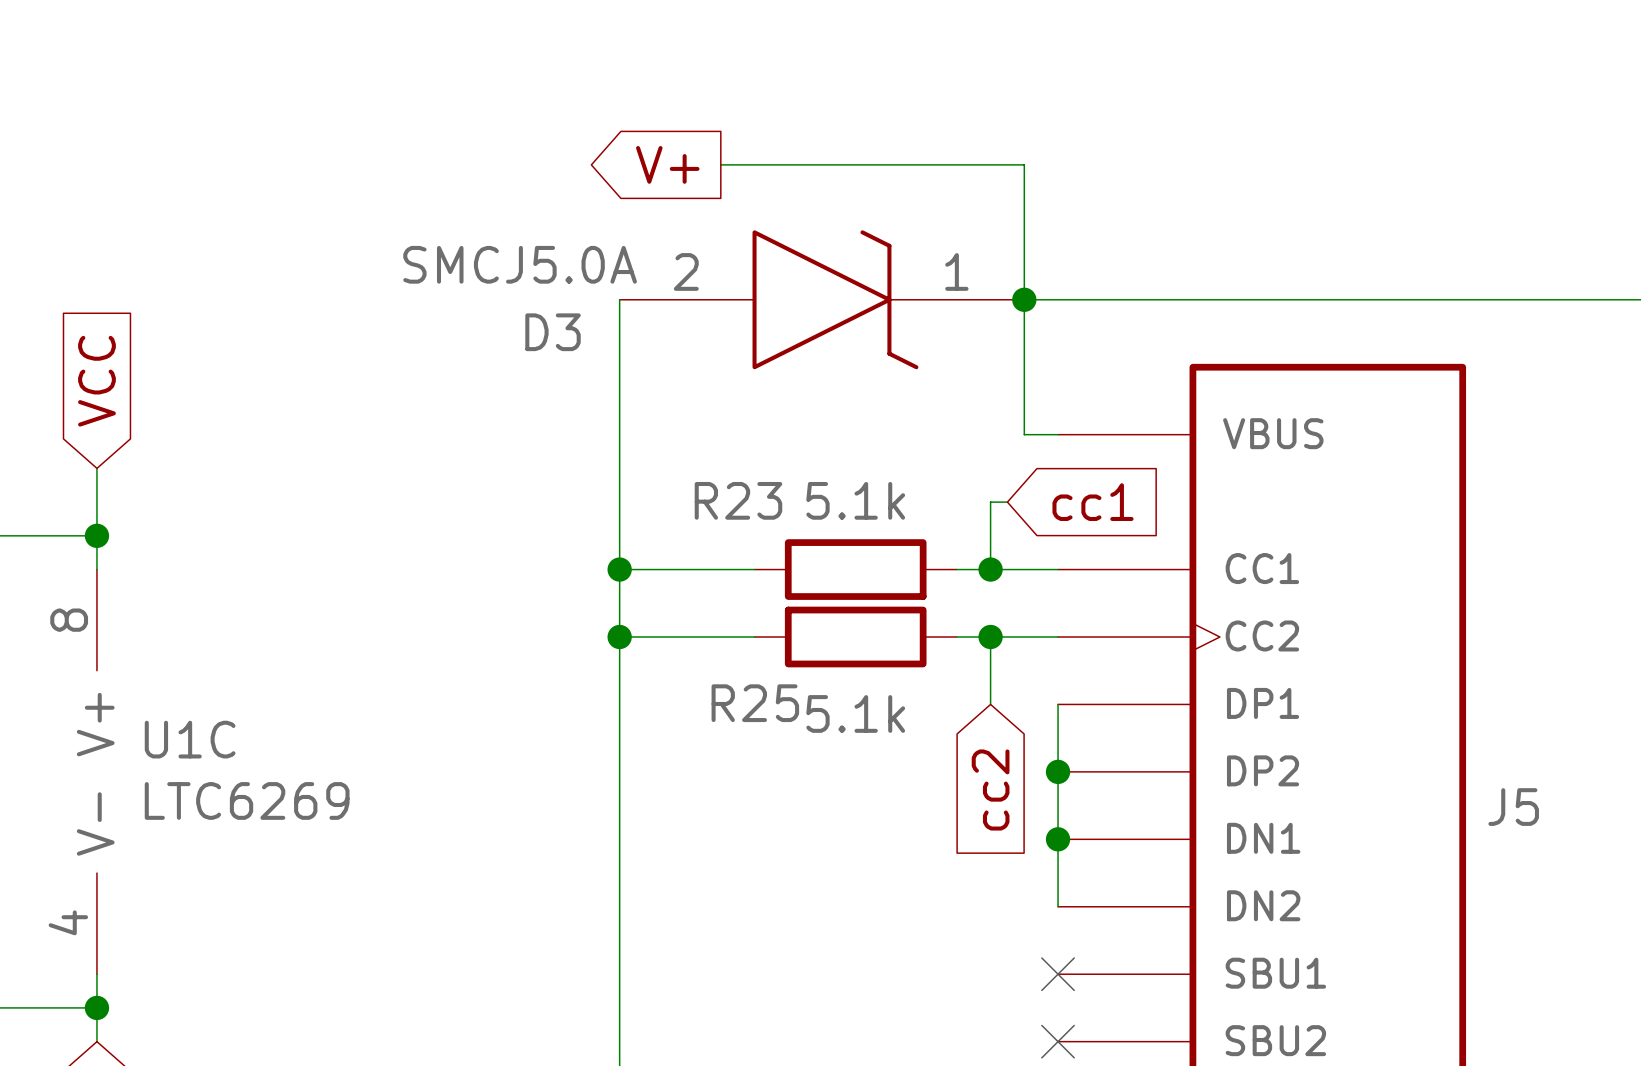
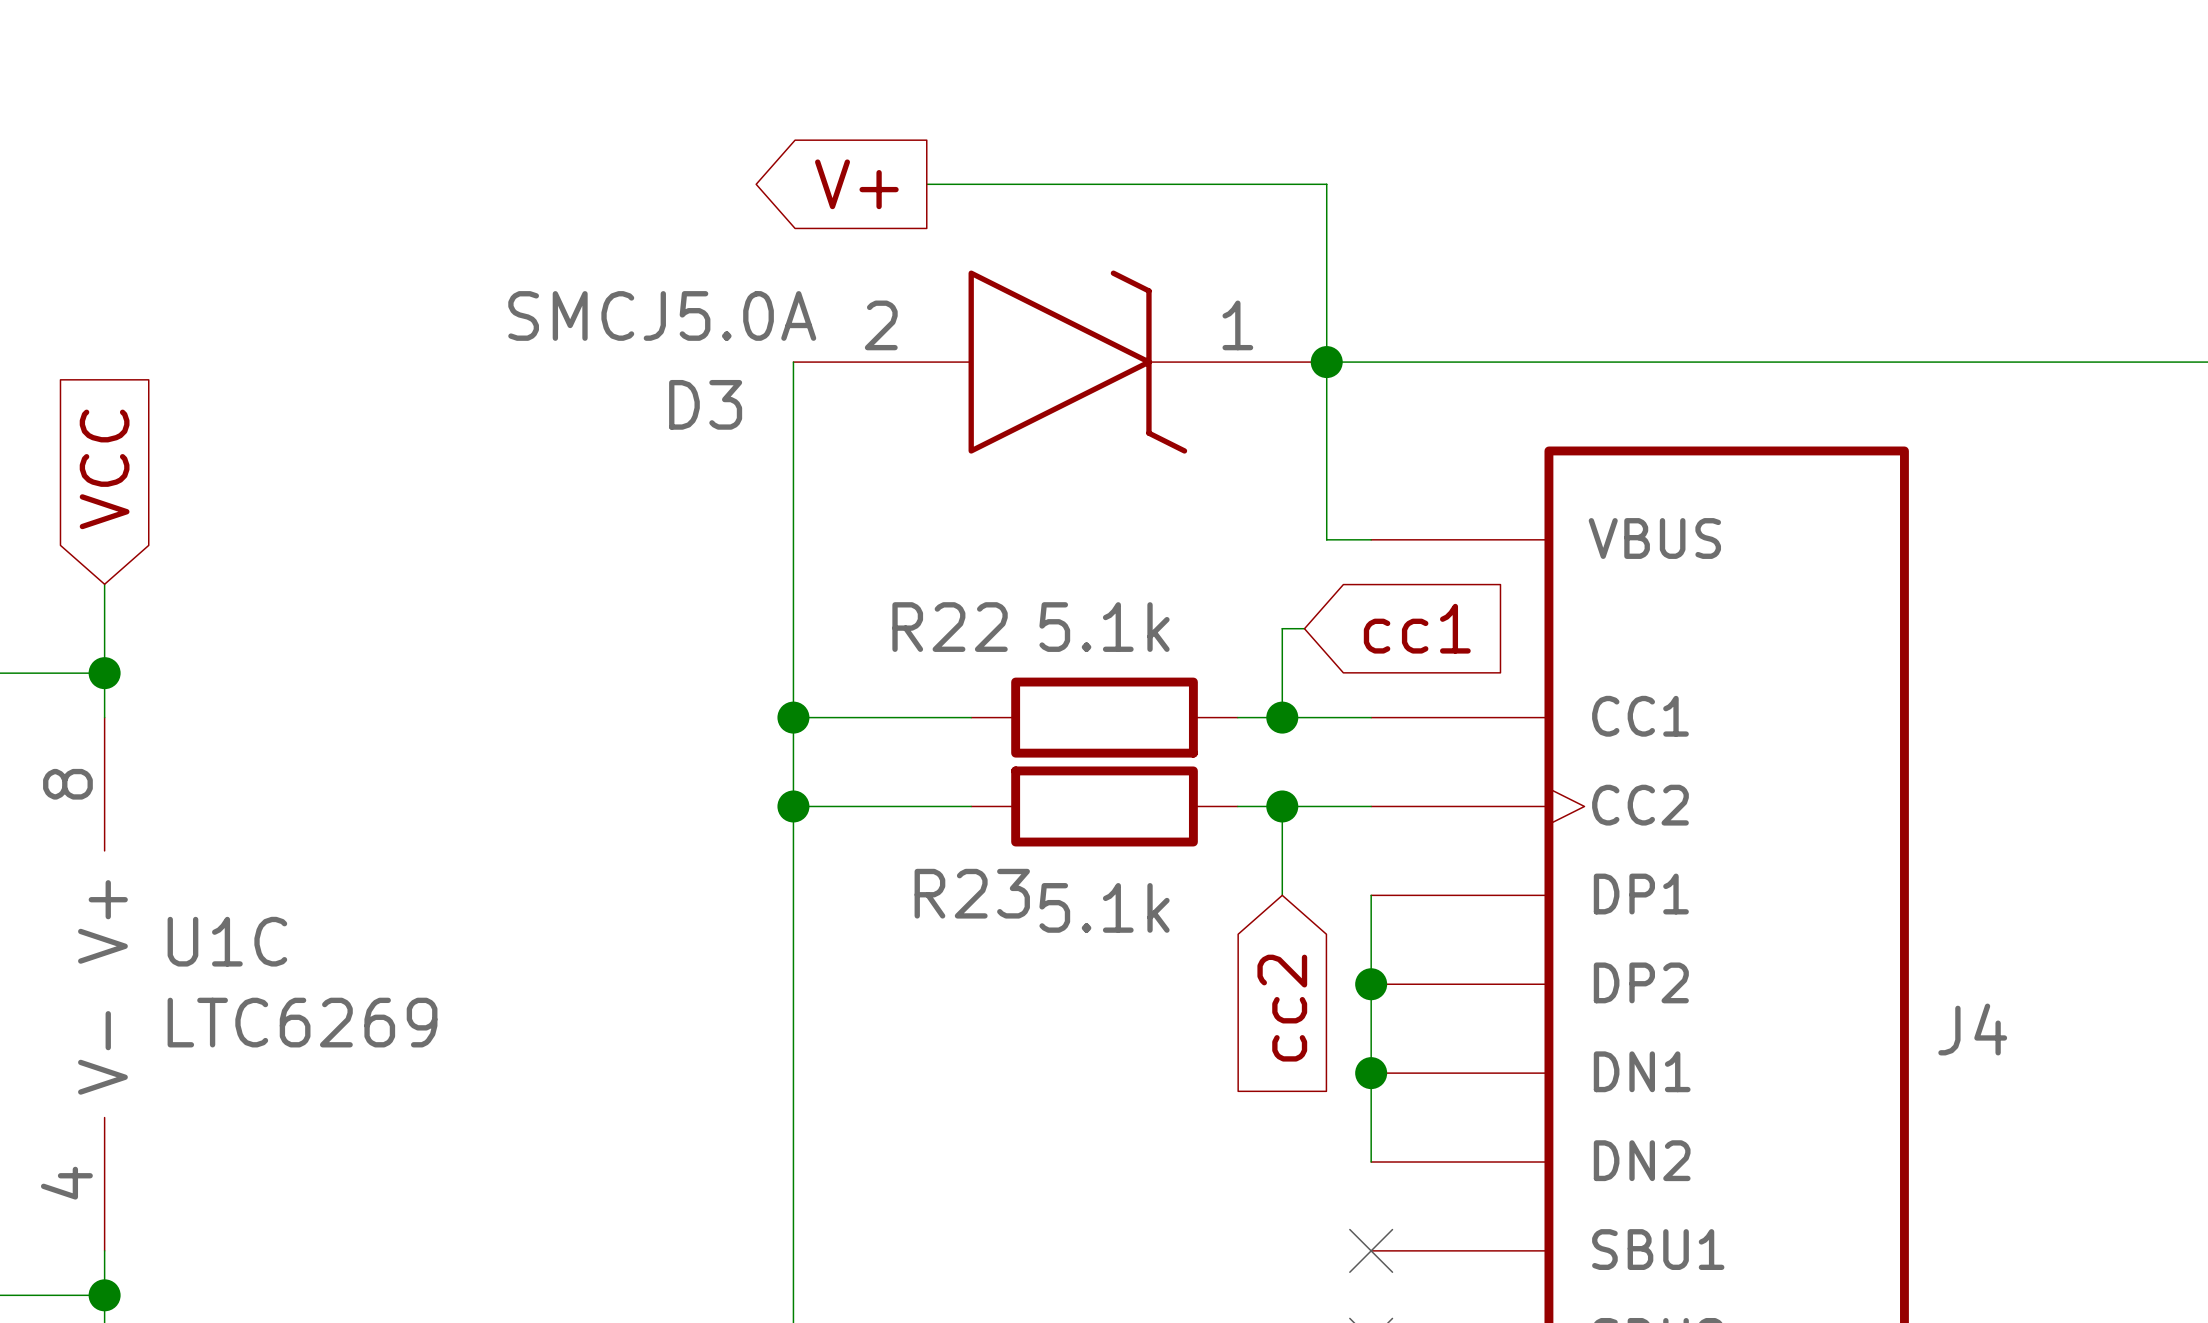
R23 name: R23 (738, 500) -> R22 (950, 627)
R25 name: R25 (755, 703) -> R23 (972, 893)
J5 name: J5 (1513, 807) -> J4 (1972, 1029)

